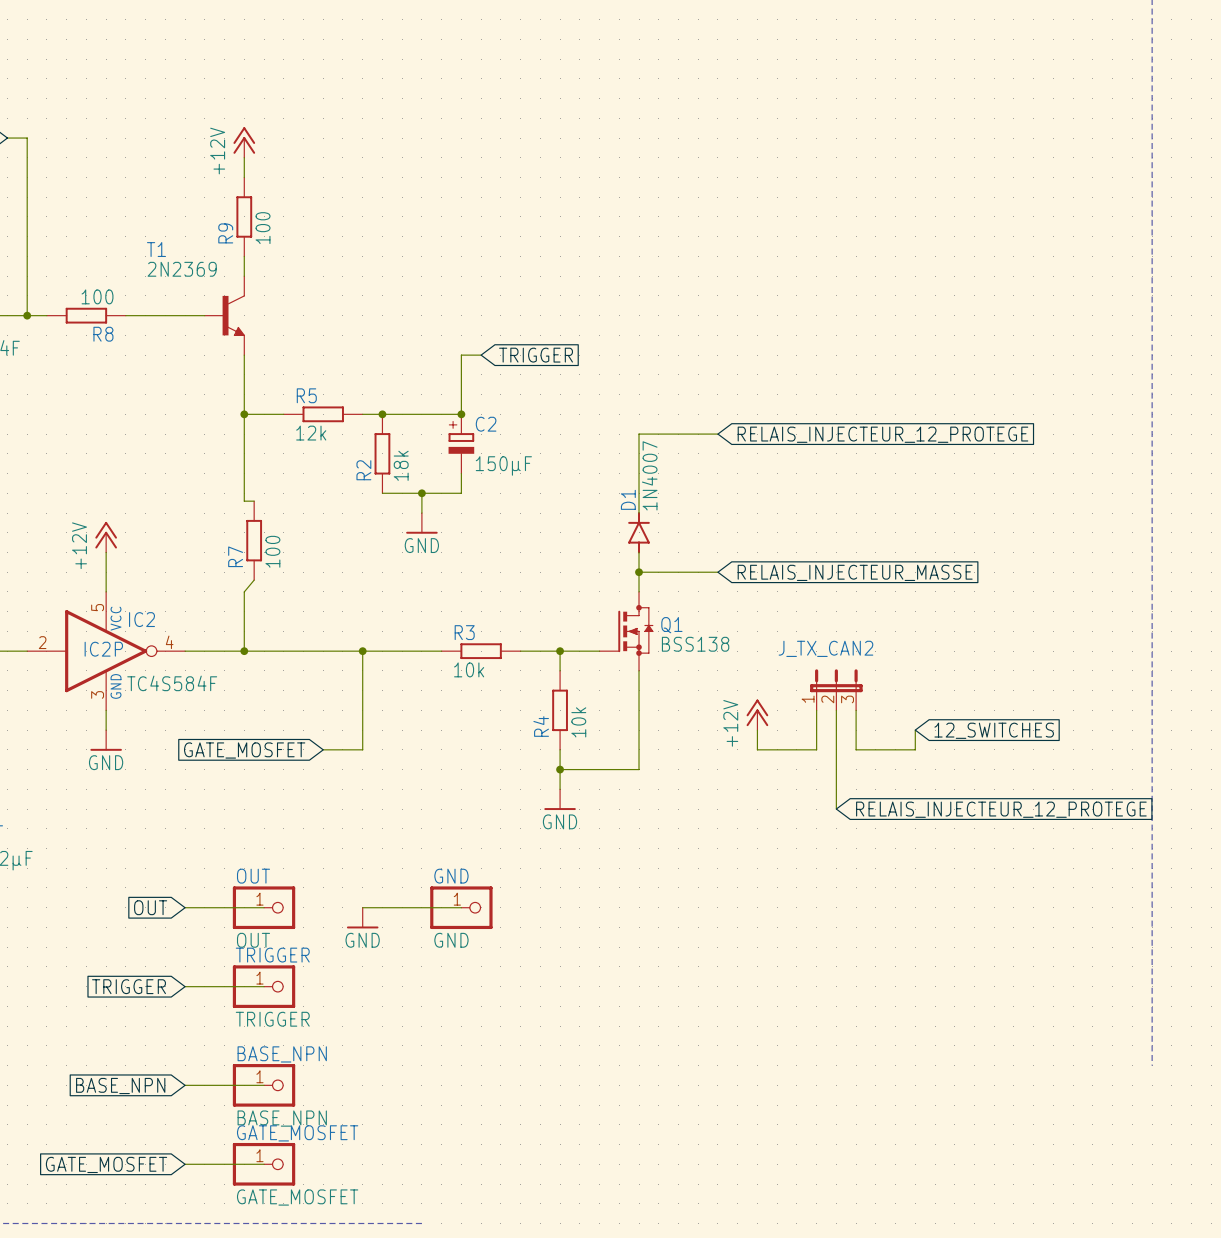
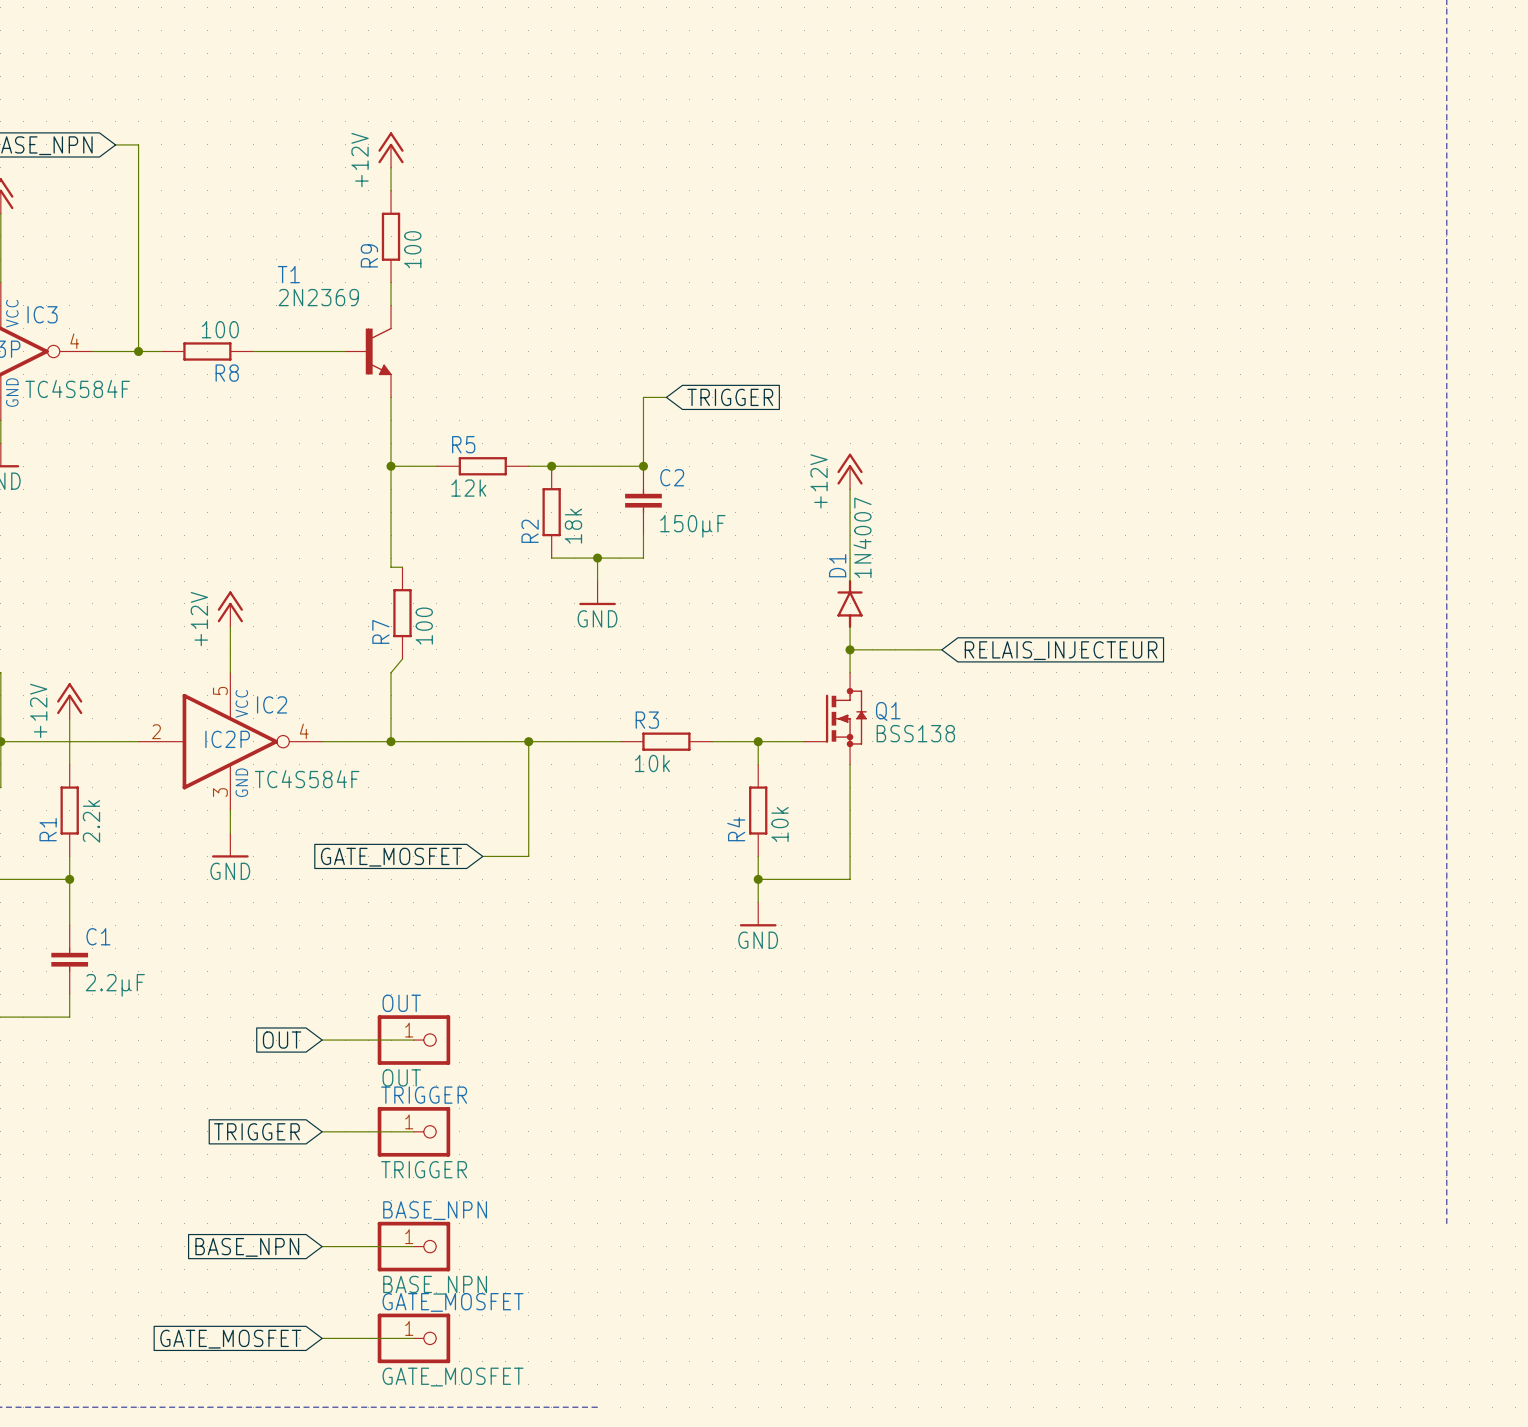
C2 symbol: [448, 414, 475, 474] -> [625, 466, 662, 536]
power symbol: none -> +12V (850, 471)
wire: (639, 434) (717, 434) -> none
global label: RELAIS_INJECTEUR_12_PROTEGE (882, 434) -> none
global label: RELAIS_INJECTEUR_MASSE (855, 572) -> RELAIS_INJECTEUR (1061, 650)
J_TX_CAN2: (836, 689) -> none
wire: (816, 710) (816, 749) (757, 749) (757, 730) -> none
wire: (836, 710) (836, 809) -> none
wire: (856, 710) (856, 749) (915, 749) (915, 730) -> none
power symbol: +12V (757, 714) -> none
global label: 12_SWITCHES (994, 730) -> none
global label: RELAIS_INJECTEUR_12_PROTEGE (1001, 809) -> none
wire: (362, 907) (461, 907) -> none
GND: GND (461, 907) -> none
power symbol: GND (362, 918) -> none

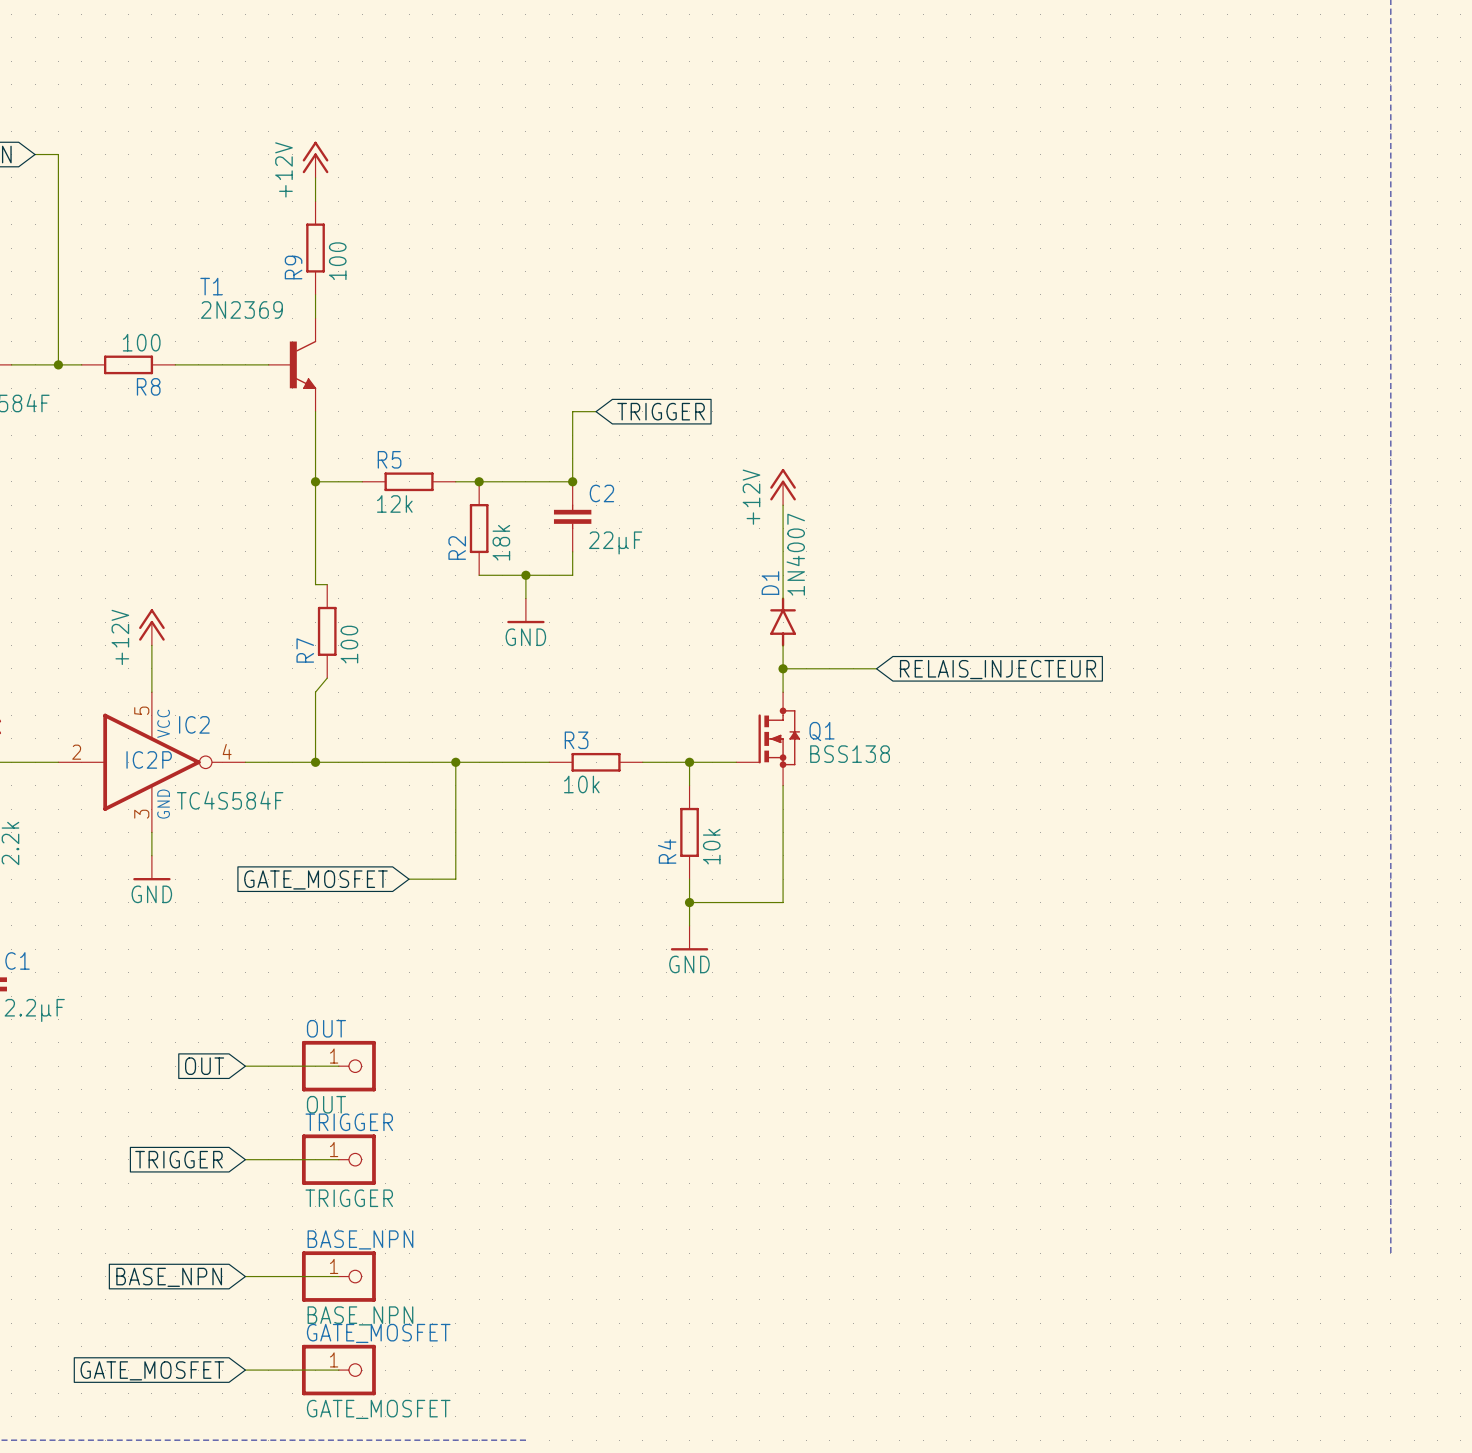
C2 value: 150µF (692, 526) -> 22µF (615, 542)

